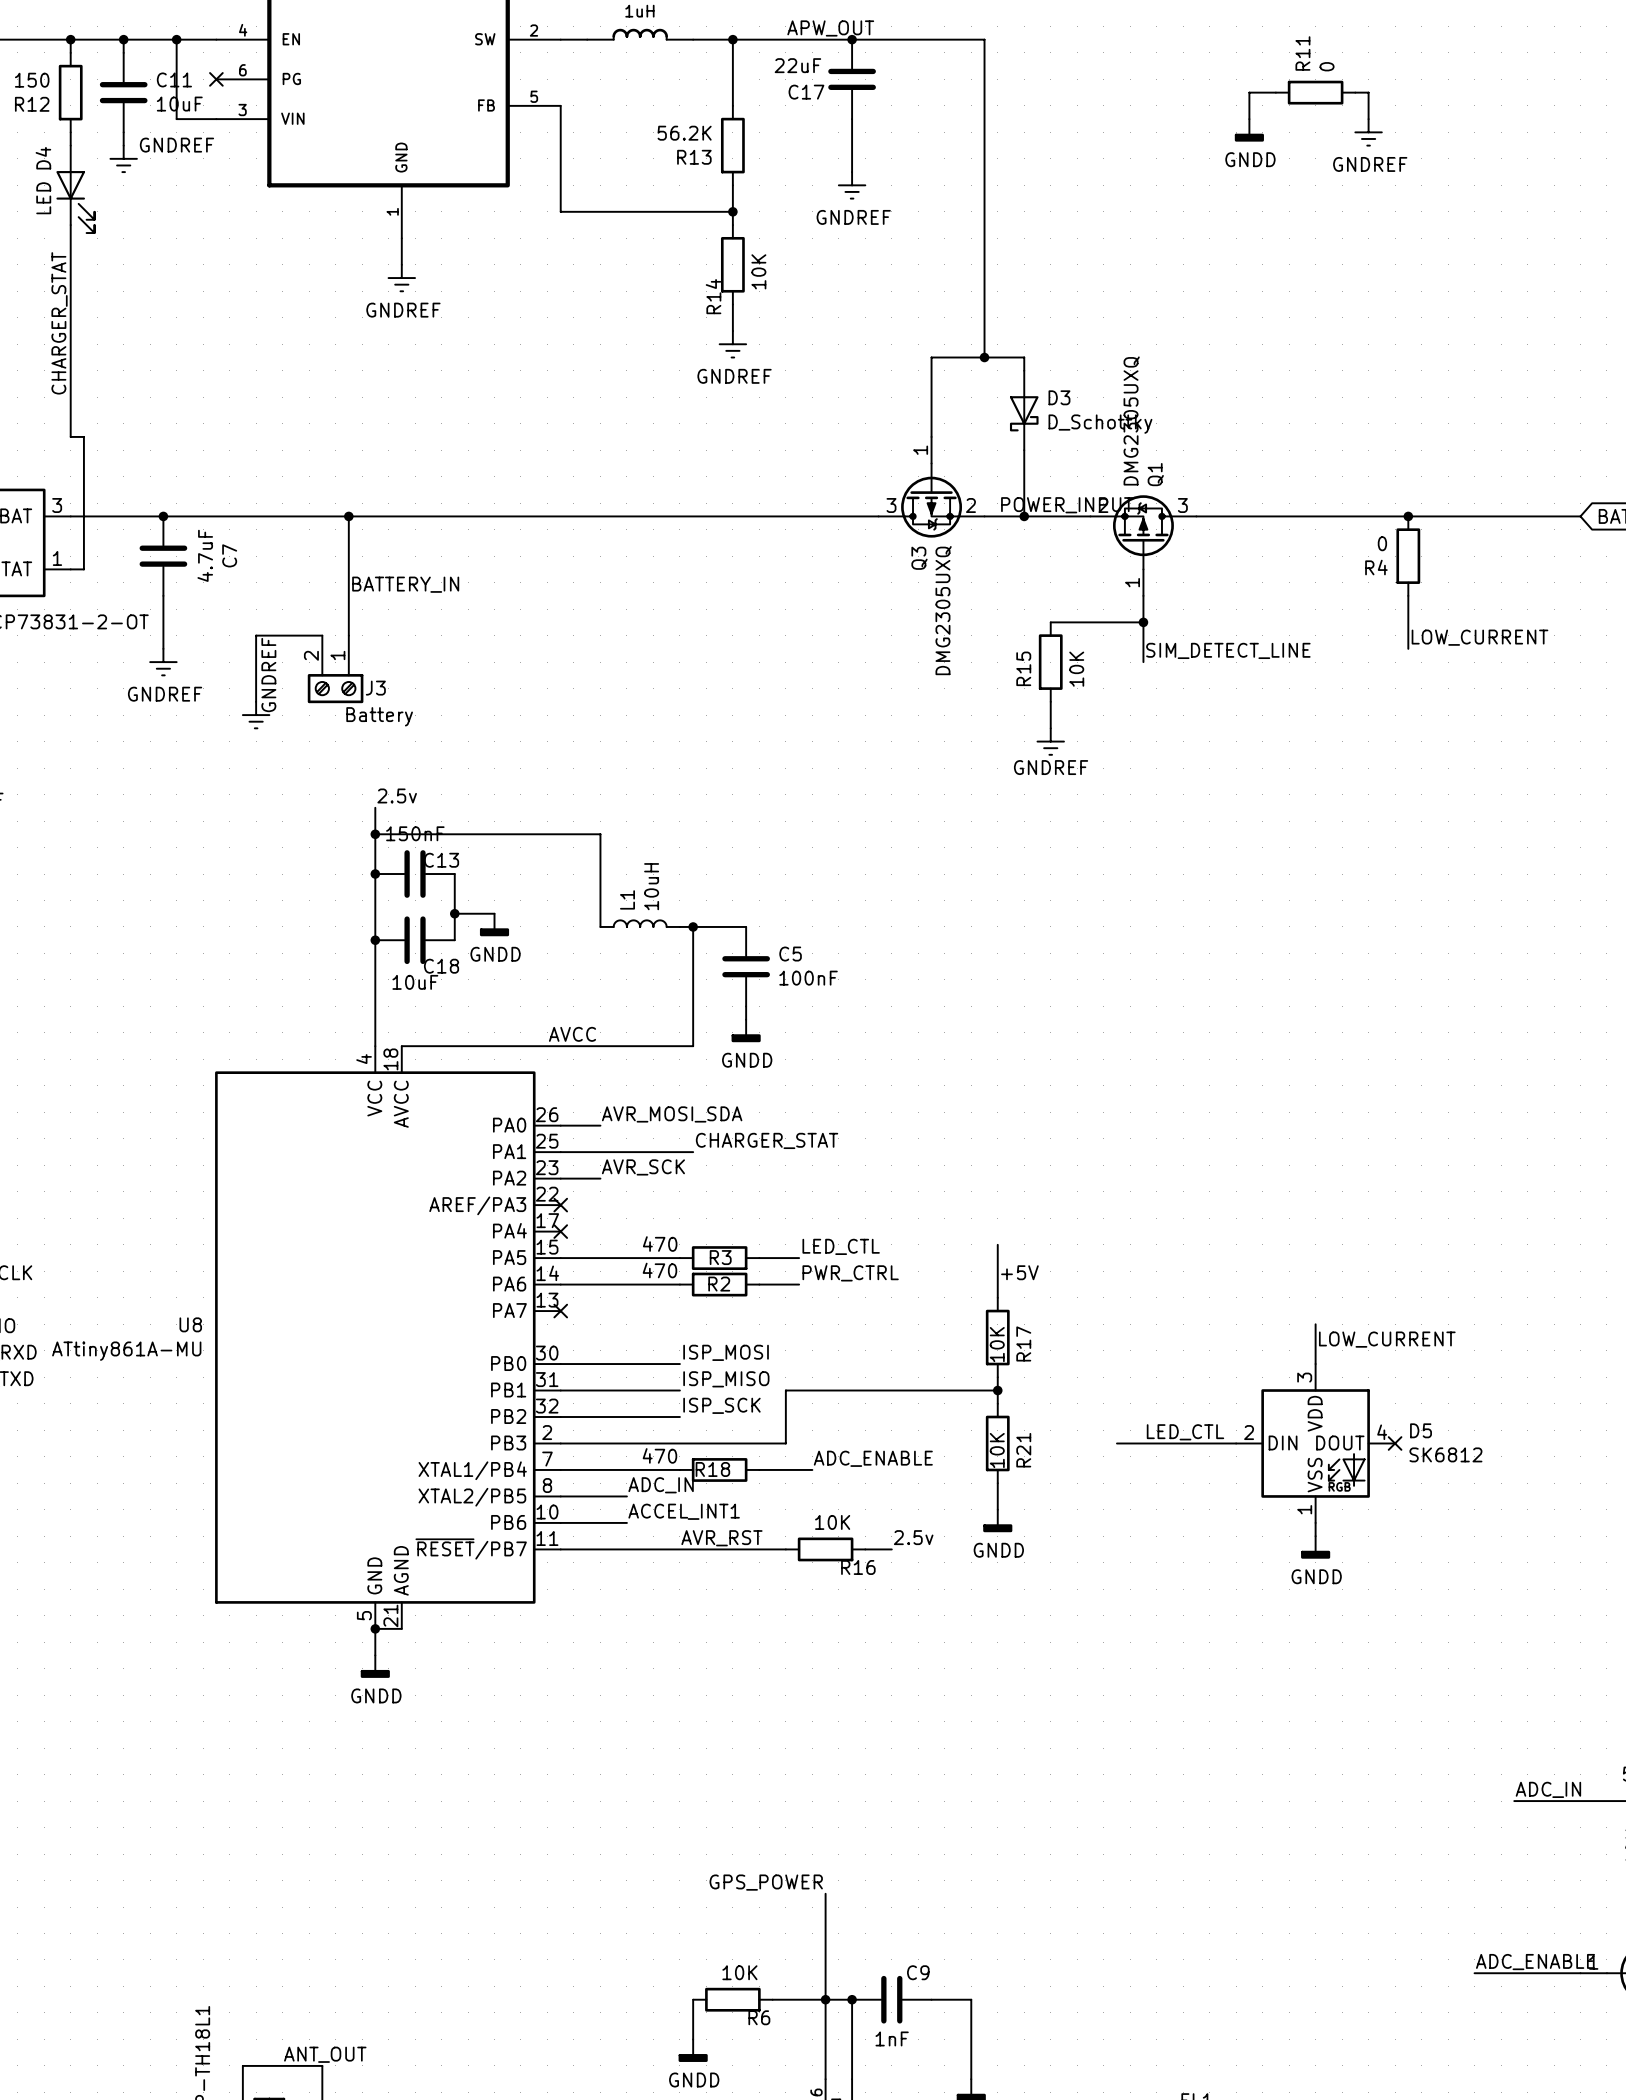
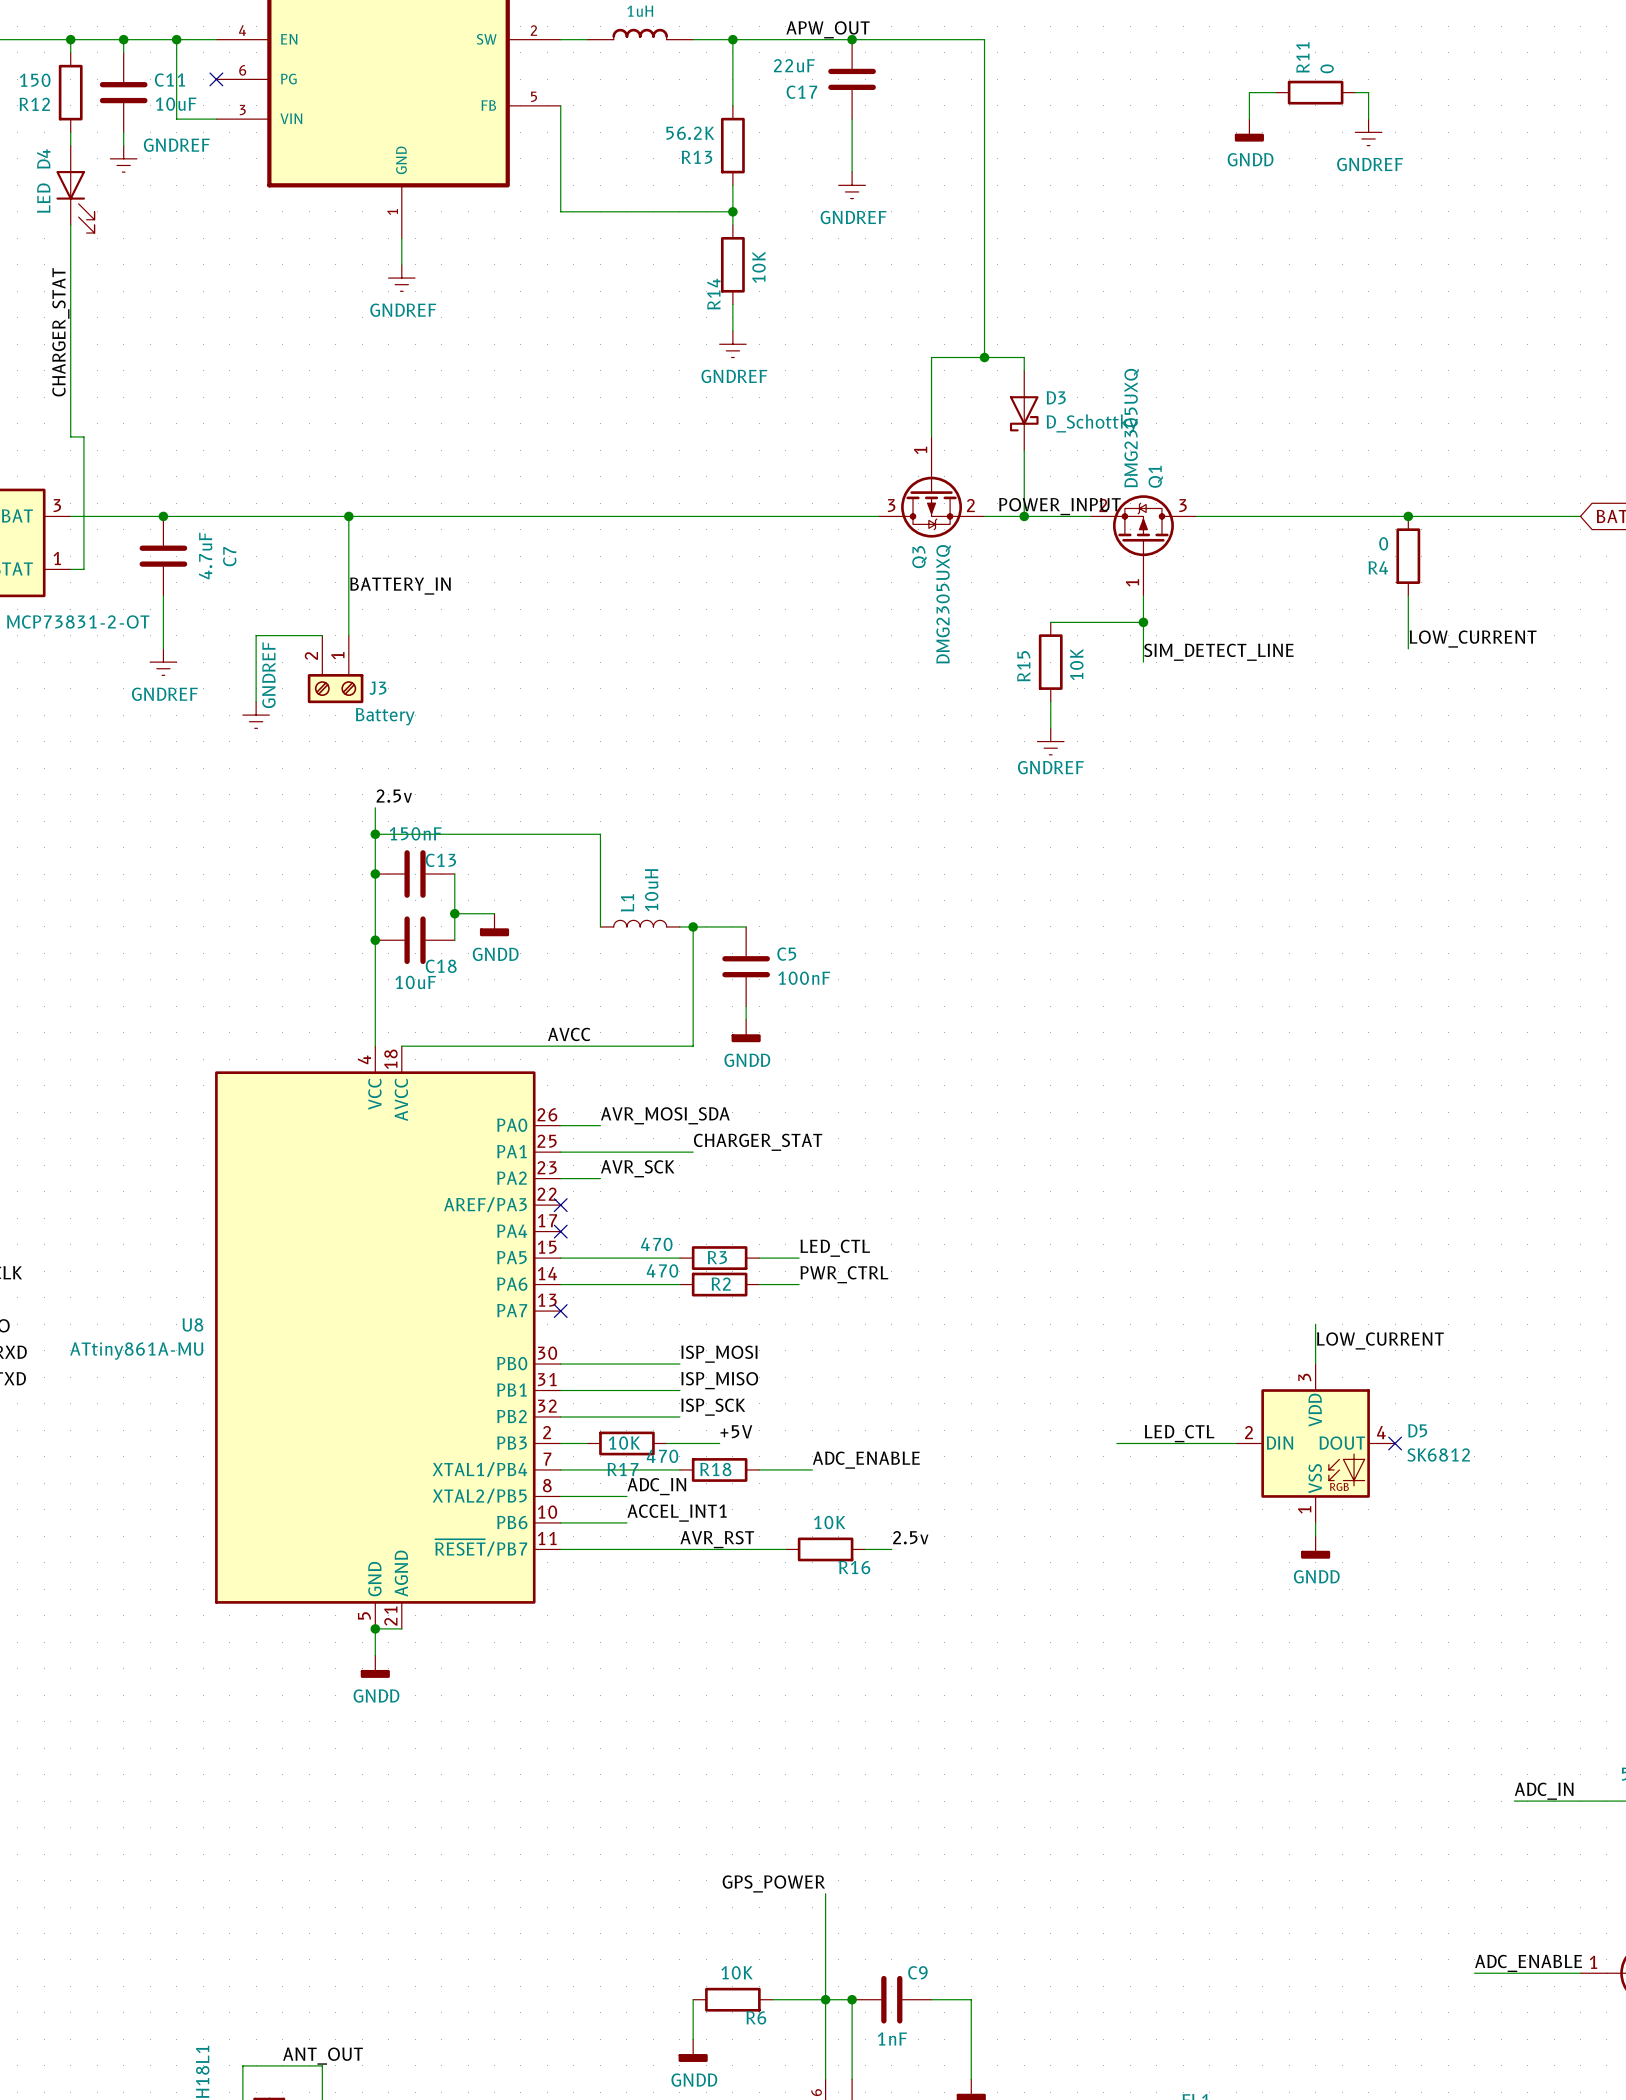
wire: (997, 1244) (997, 1297) -> none
label: +5V (1019, 1272) -> none
R17 rotation: 0° (997, 1337) -> 90° clockwise (626, 1443)
R17 position: (997, 1337) -> (626, 1443)
wire: (997, 1377) (997, 1403) -> none
wire: (997, 1390) (785, 1390) (785, 1443) (719, 1443) -> none
junction: (997, 1390) -> none
label: none -> +5V (736, 1431)
wire: (587, 1443) (666, 1443) -> none
R21: 10K (997, 1443) -> none
wire: (997, 1483) (997, 1509) -> none
power symbol: GNDD (997, 1520) -> none

